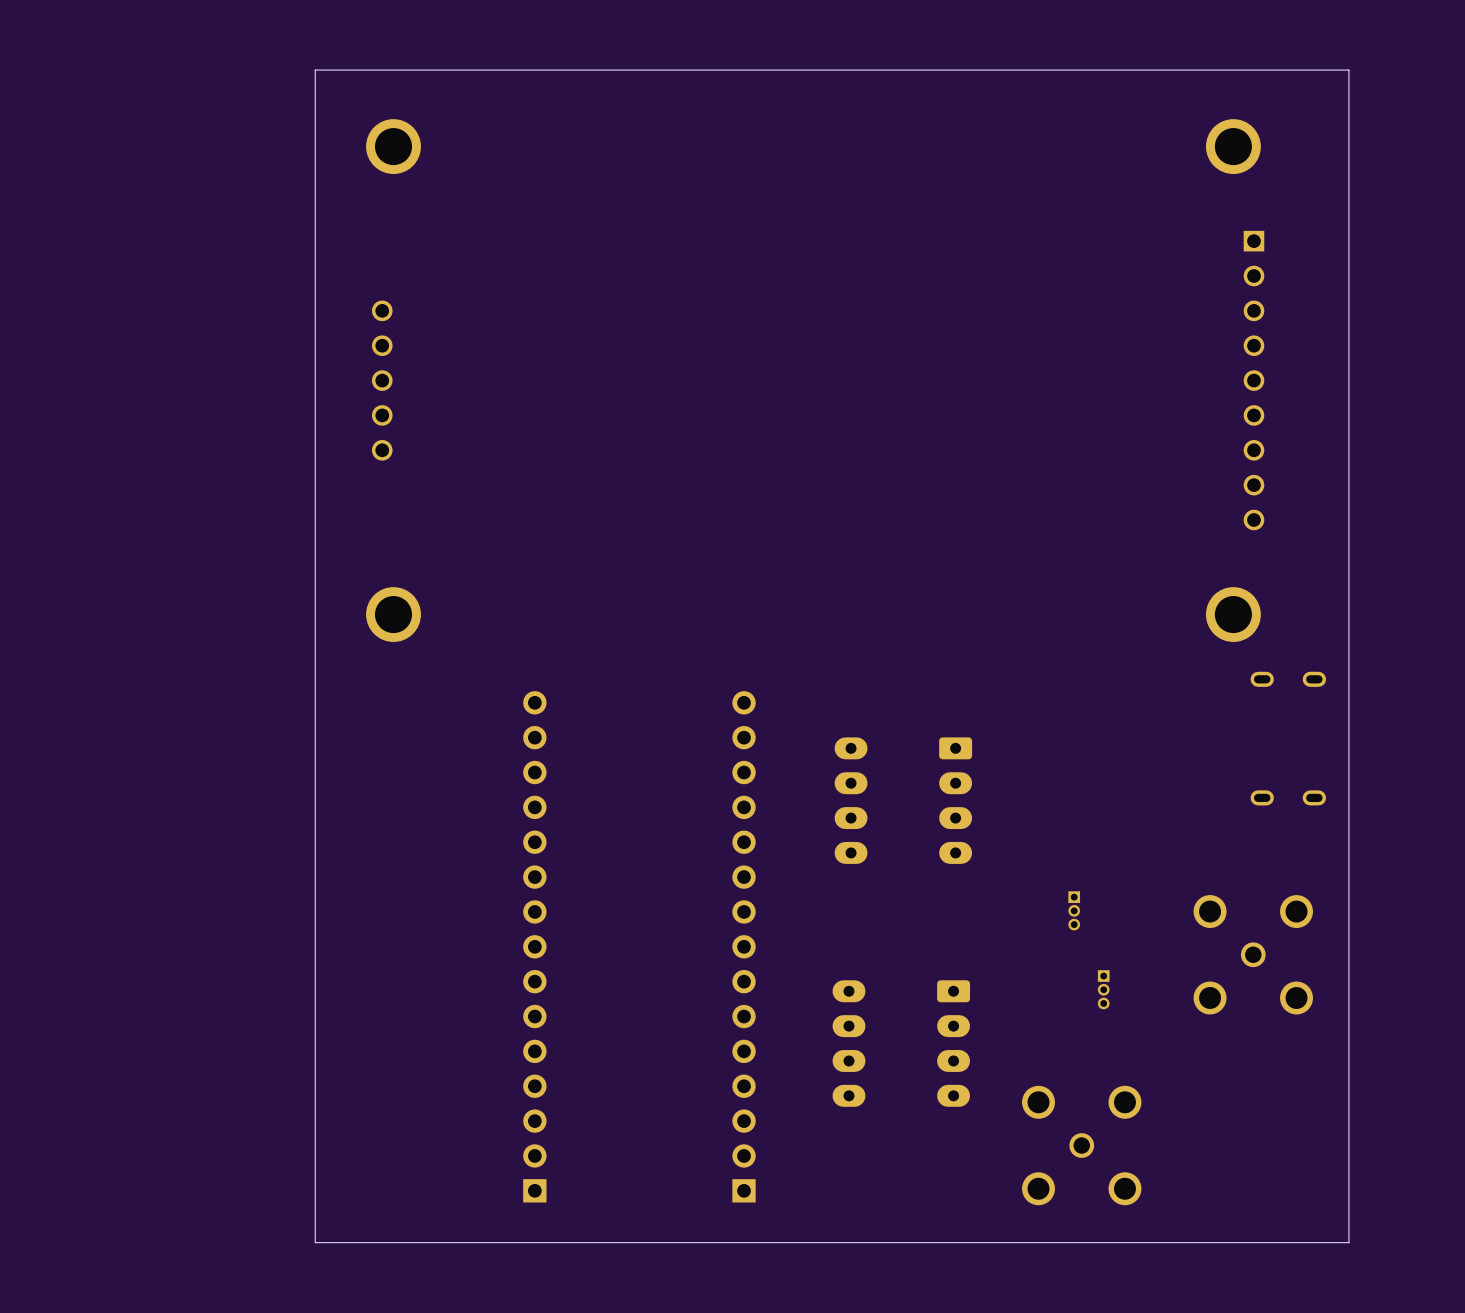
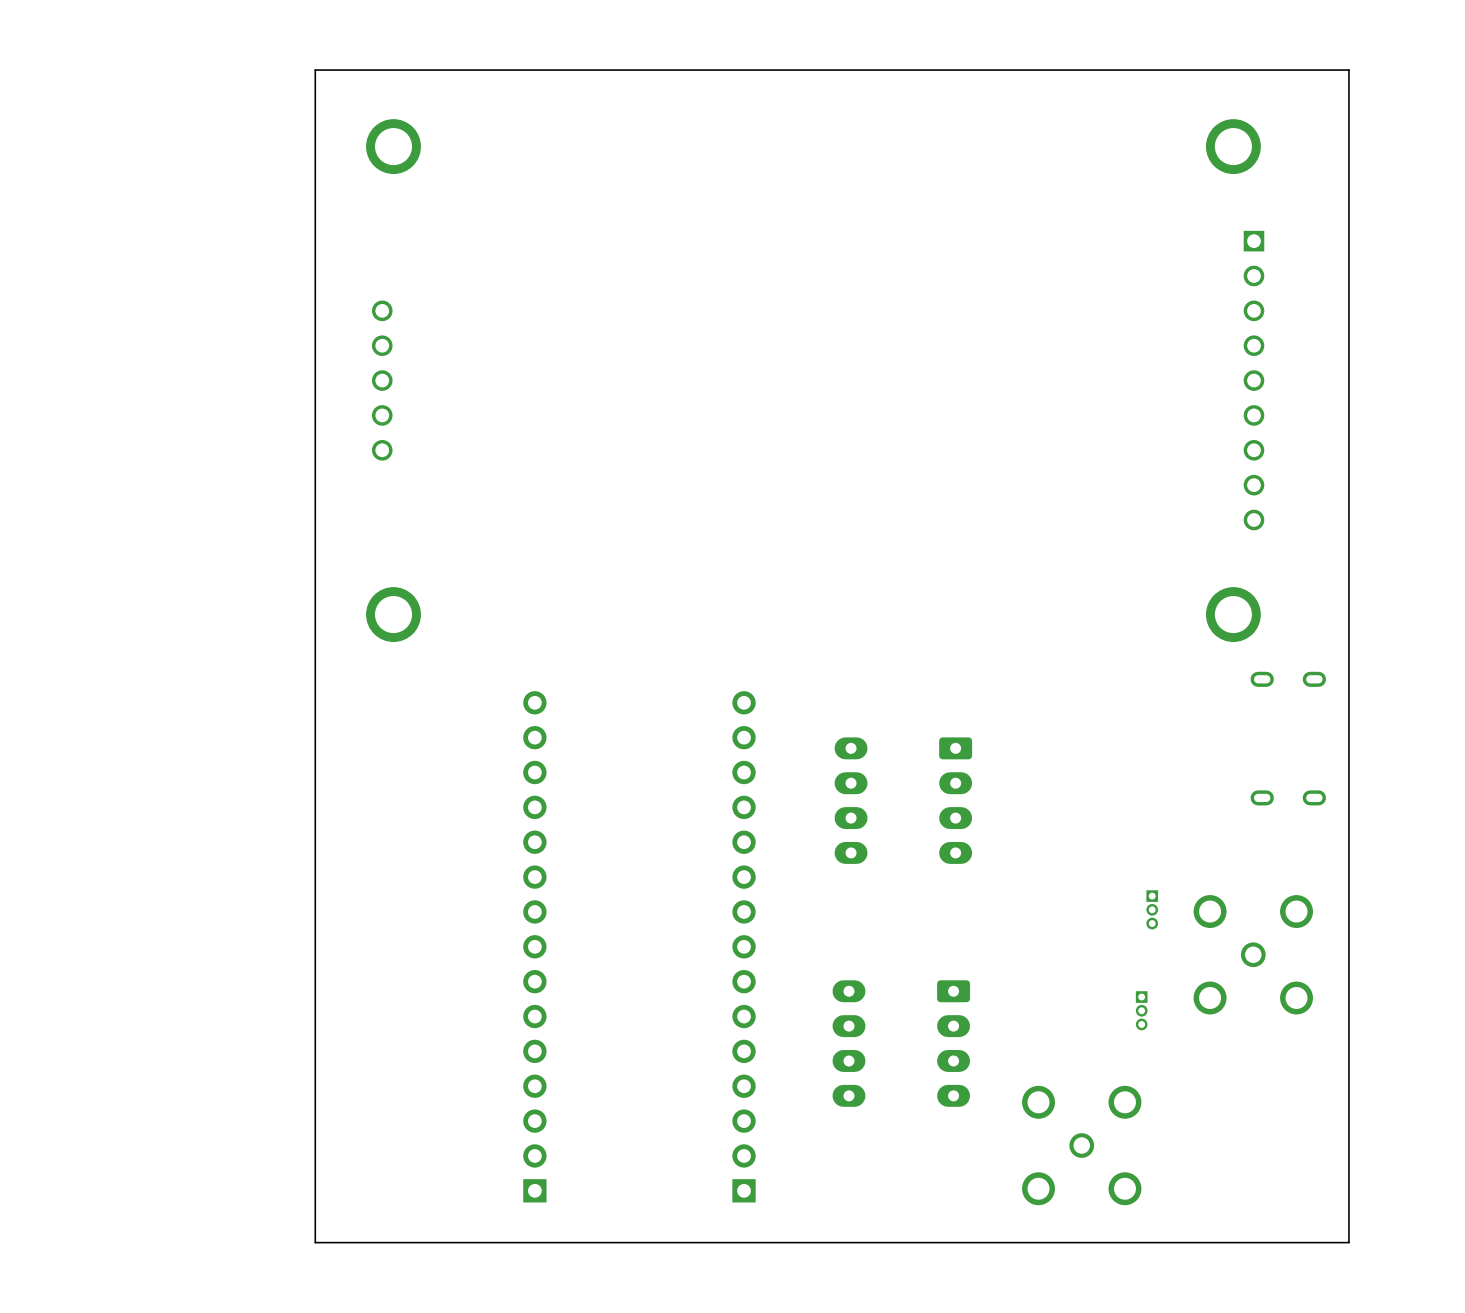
part: none -> (1152, 909)
part: (1074, 910) -> none
part position: (1103, 989) -> (1141, 1010)

